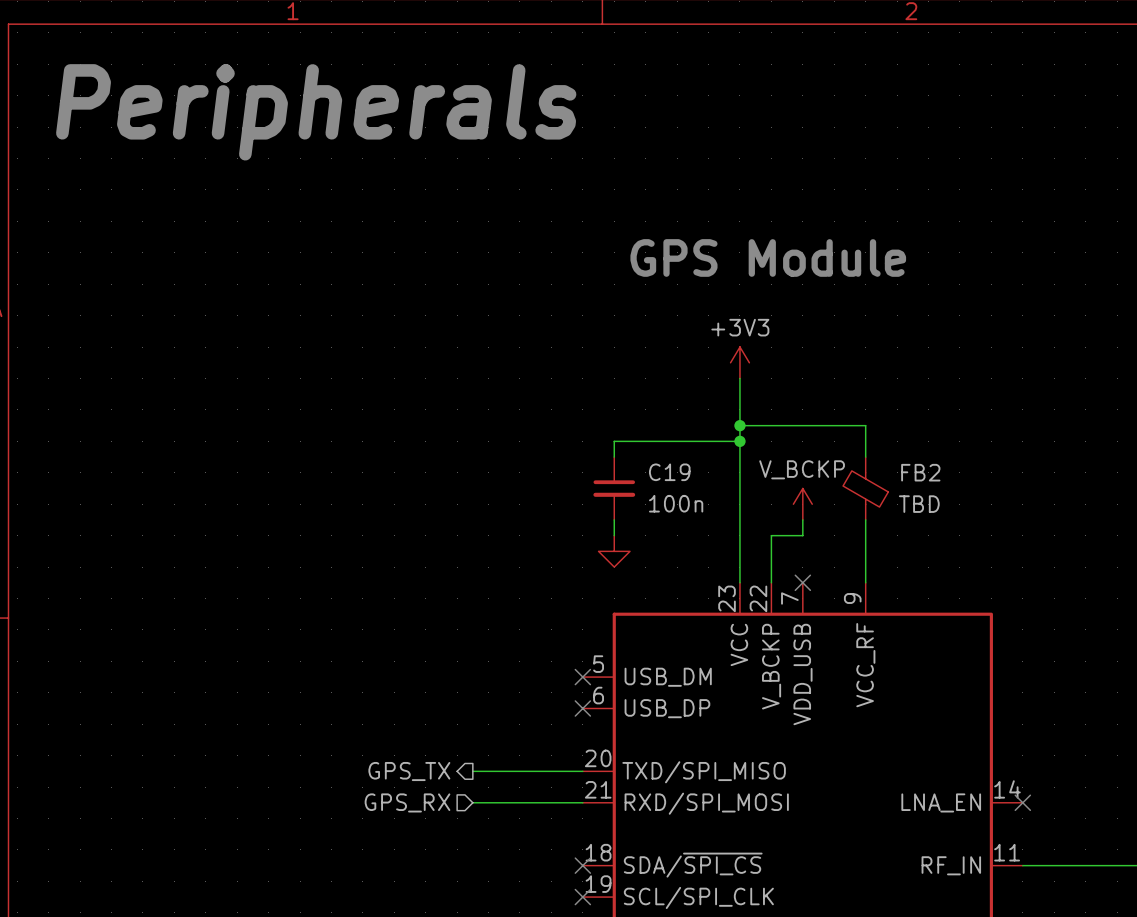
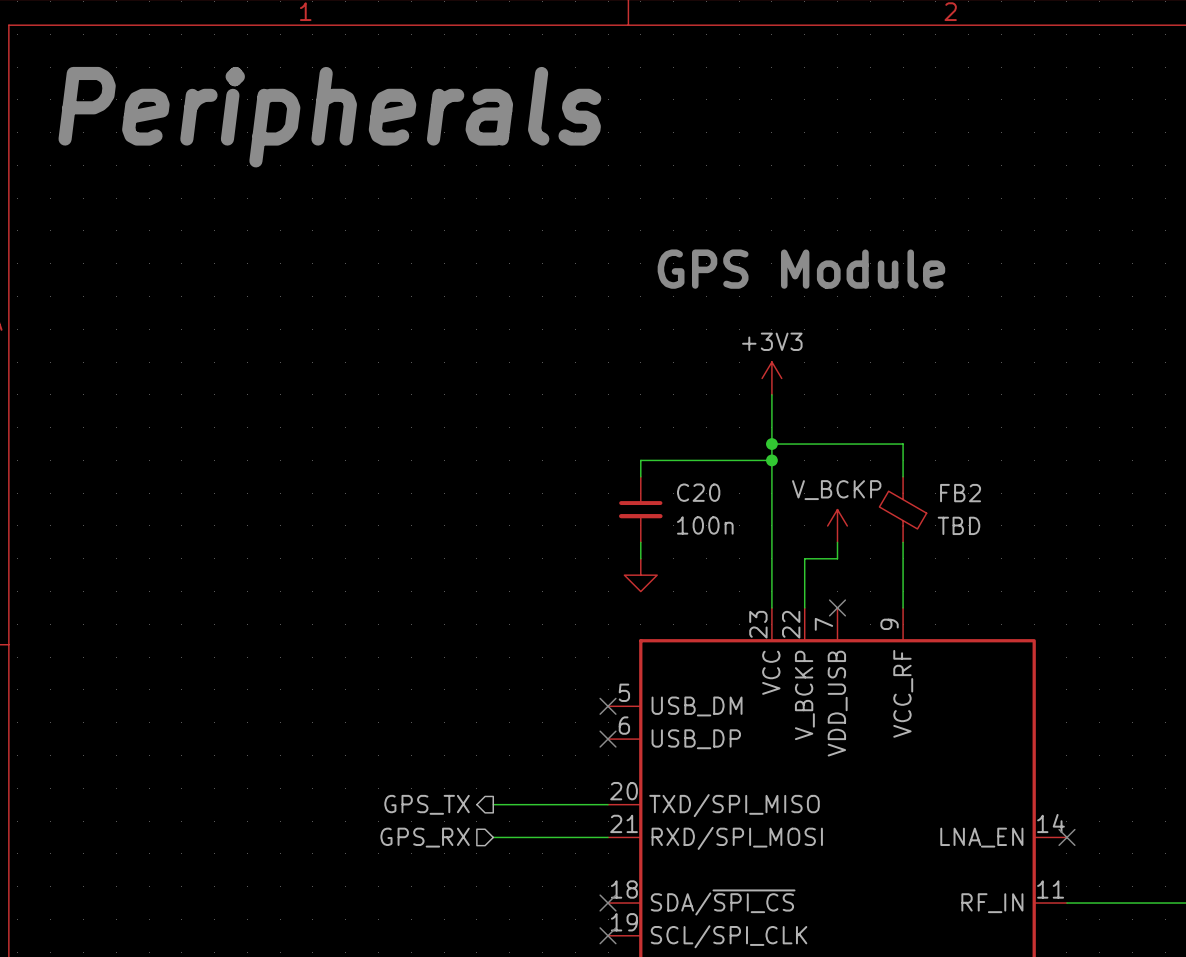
C19 name: C19 (669, 472) -> C20 (698, 492)

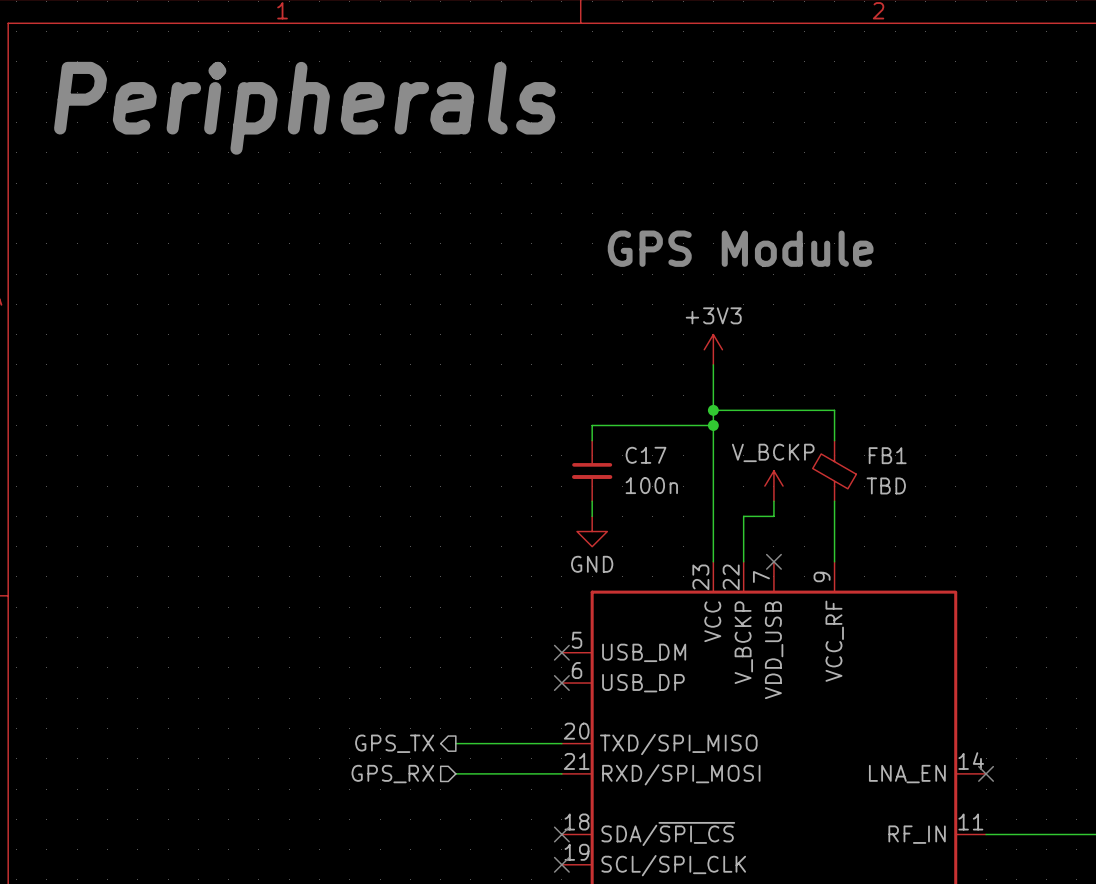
C20 name: C20 (698, 492) -> C17 (646, 455)
FB2 name: FB2 (960, 493) -> FB1 (887, 455)
power symbol text: none -> GND (592, 564)

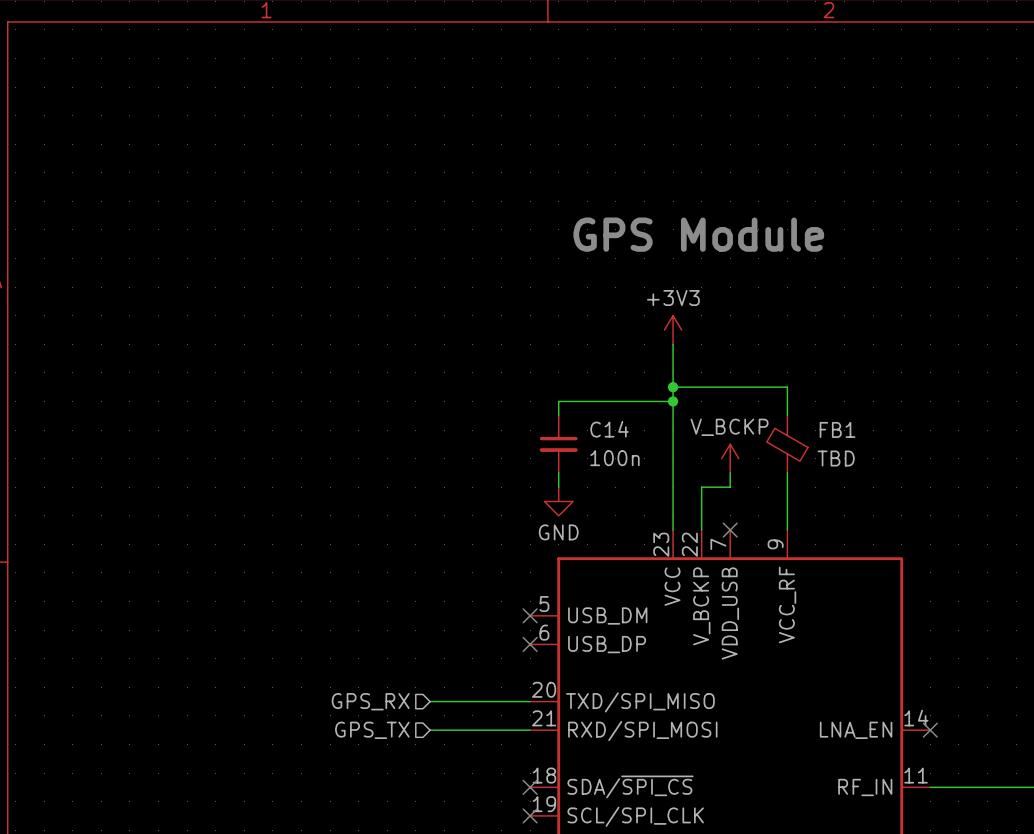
text: Peripherals (304, 108) -> none
C17 name: C17 (646, 455) -> C14 (609, 429)
hierarchical label shape: output (394, 743) -> input (370, 701)
hierarchical label: GPS_TX (394, 743) -> GPS_RX (370, 701)
hierarchical label: GPS_RX (392, 774) -> GPS_TX (372, 730)

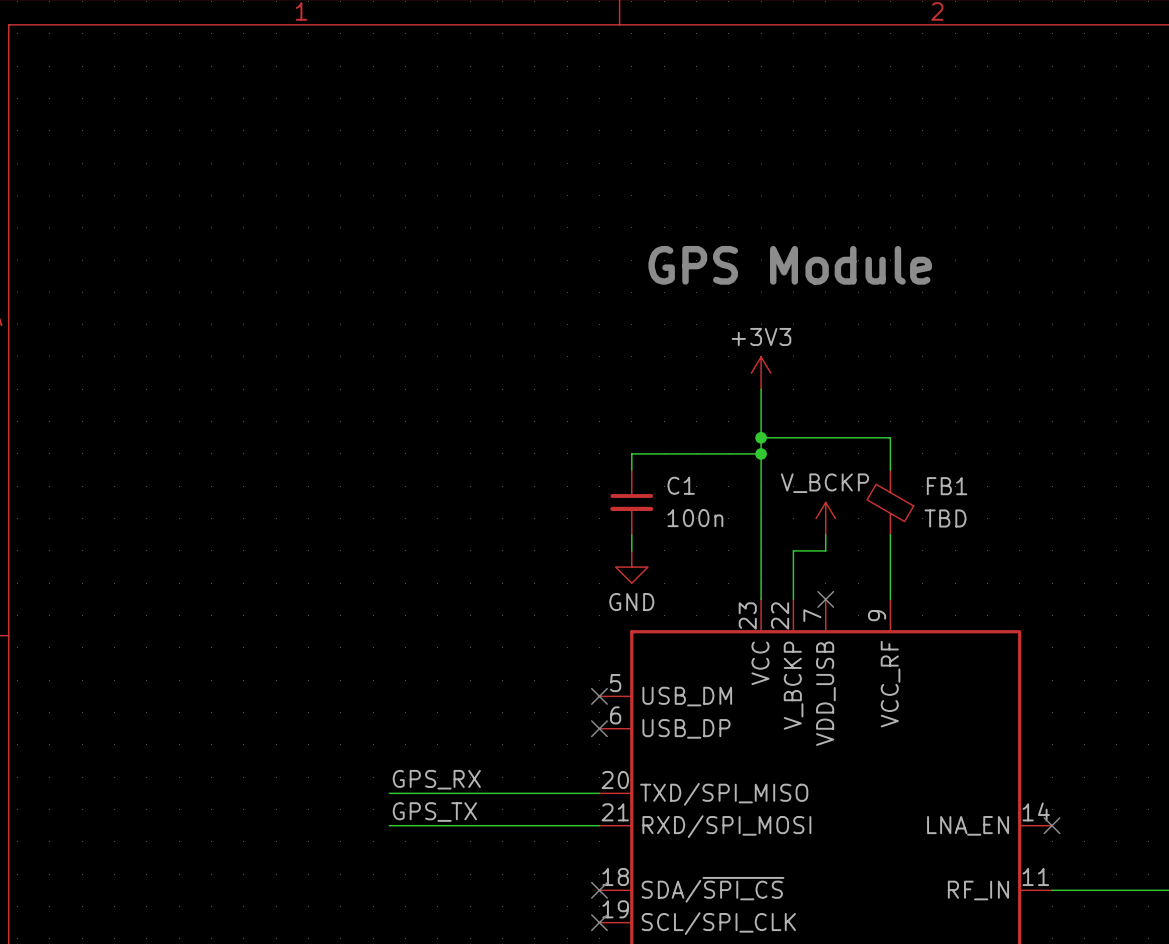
C14 name: C14 (609, 429) -> C1 (681, 485)
label: none -> GPS_RX (436, 779)
wire: none -> (389, 793) (486, 793)
hierarchical label: GPS_RX (370, 701) -> none
label: none -> GPS_TX (434, 812)
wire: none -> (389, 825) (486, 825)
hierarchical label: GPS_TX (372, 730) -> none

